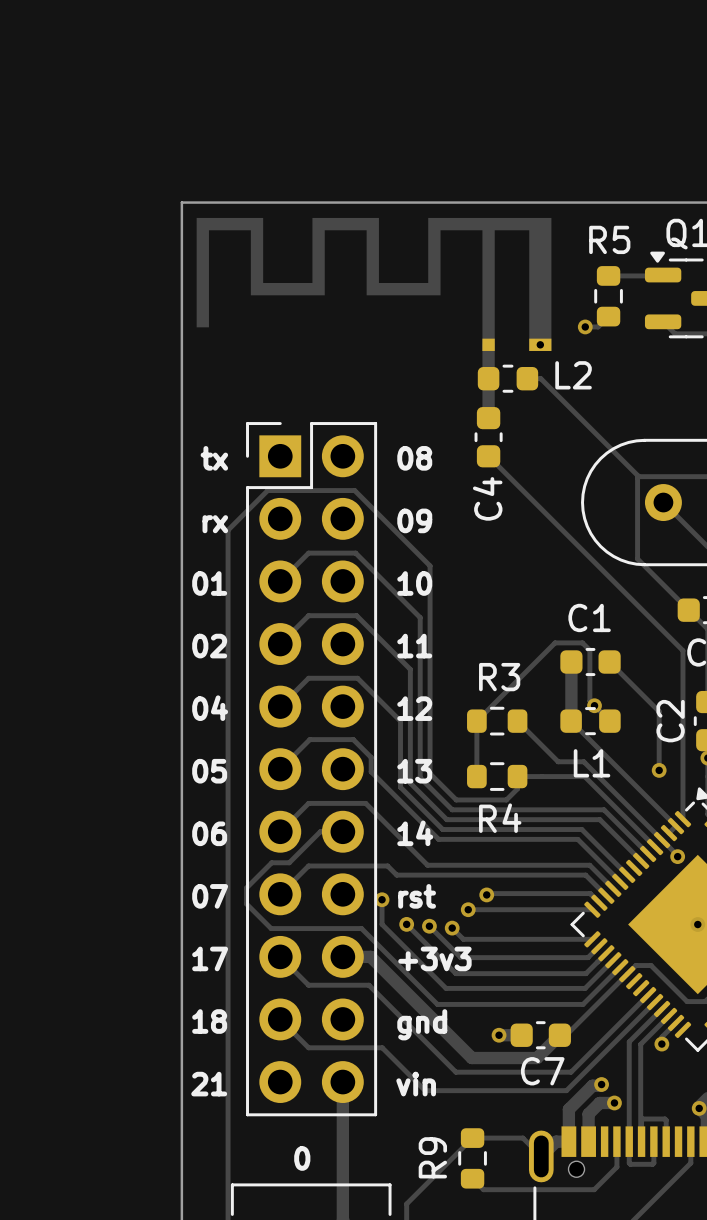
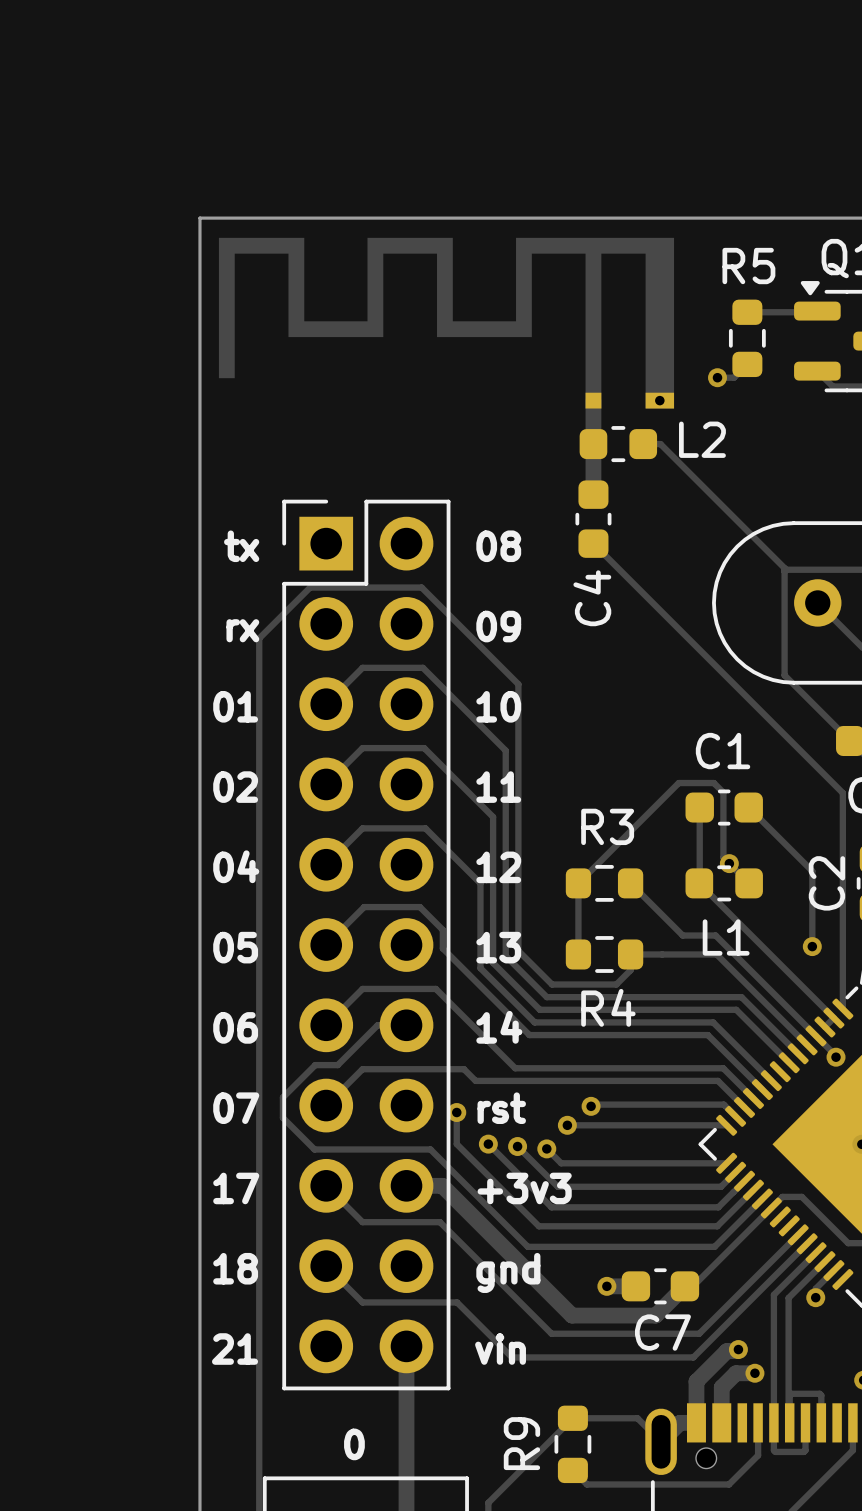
track width: thick (571, 662) (571, 720) -> thin (699, 807) (699, 882)

